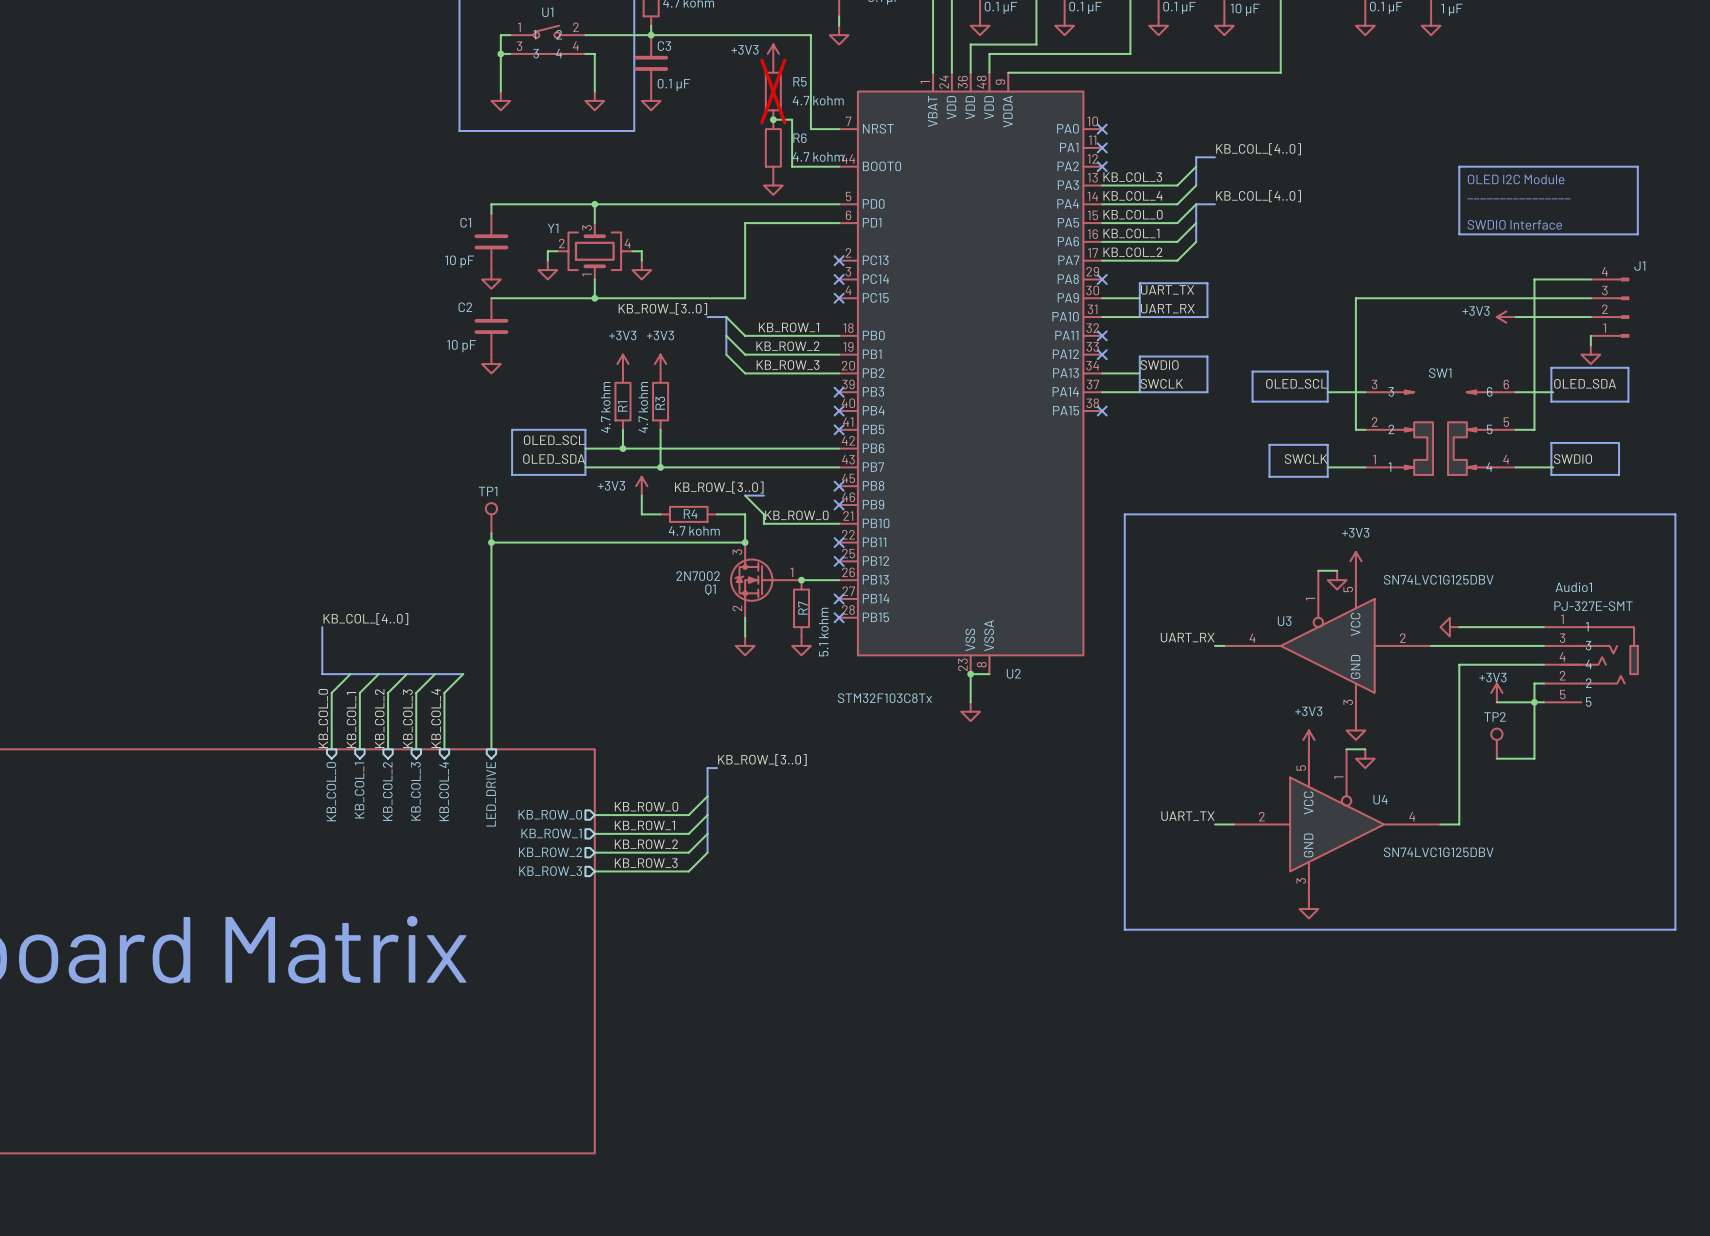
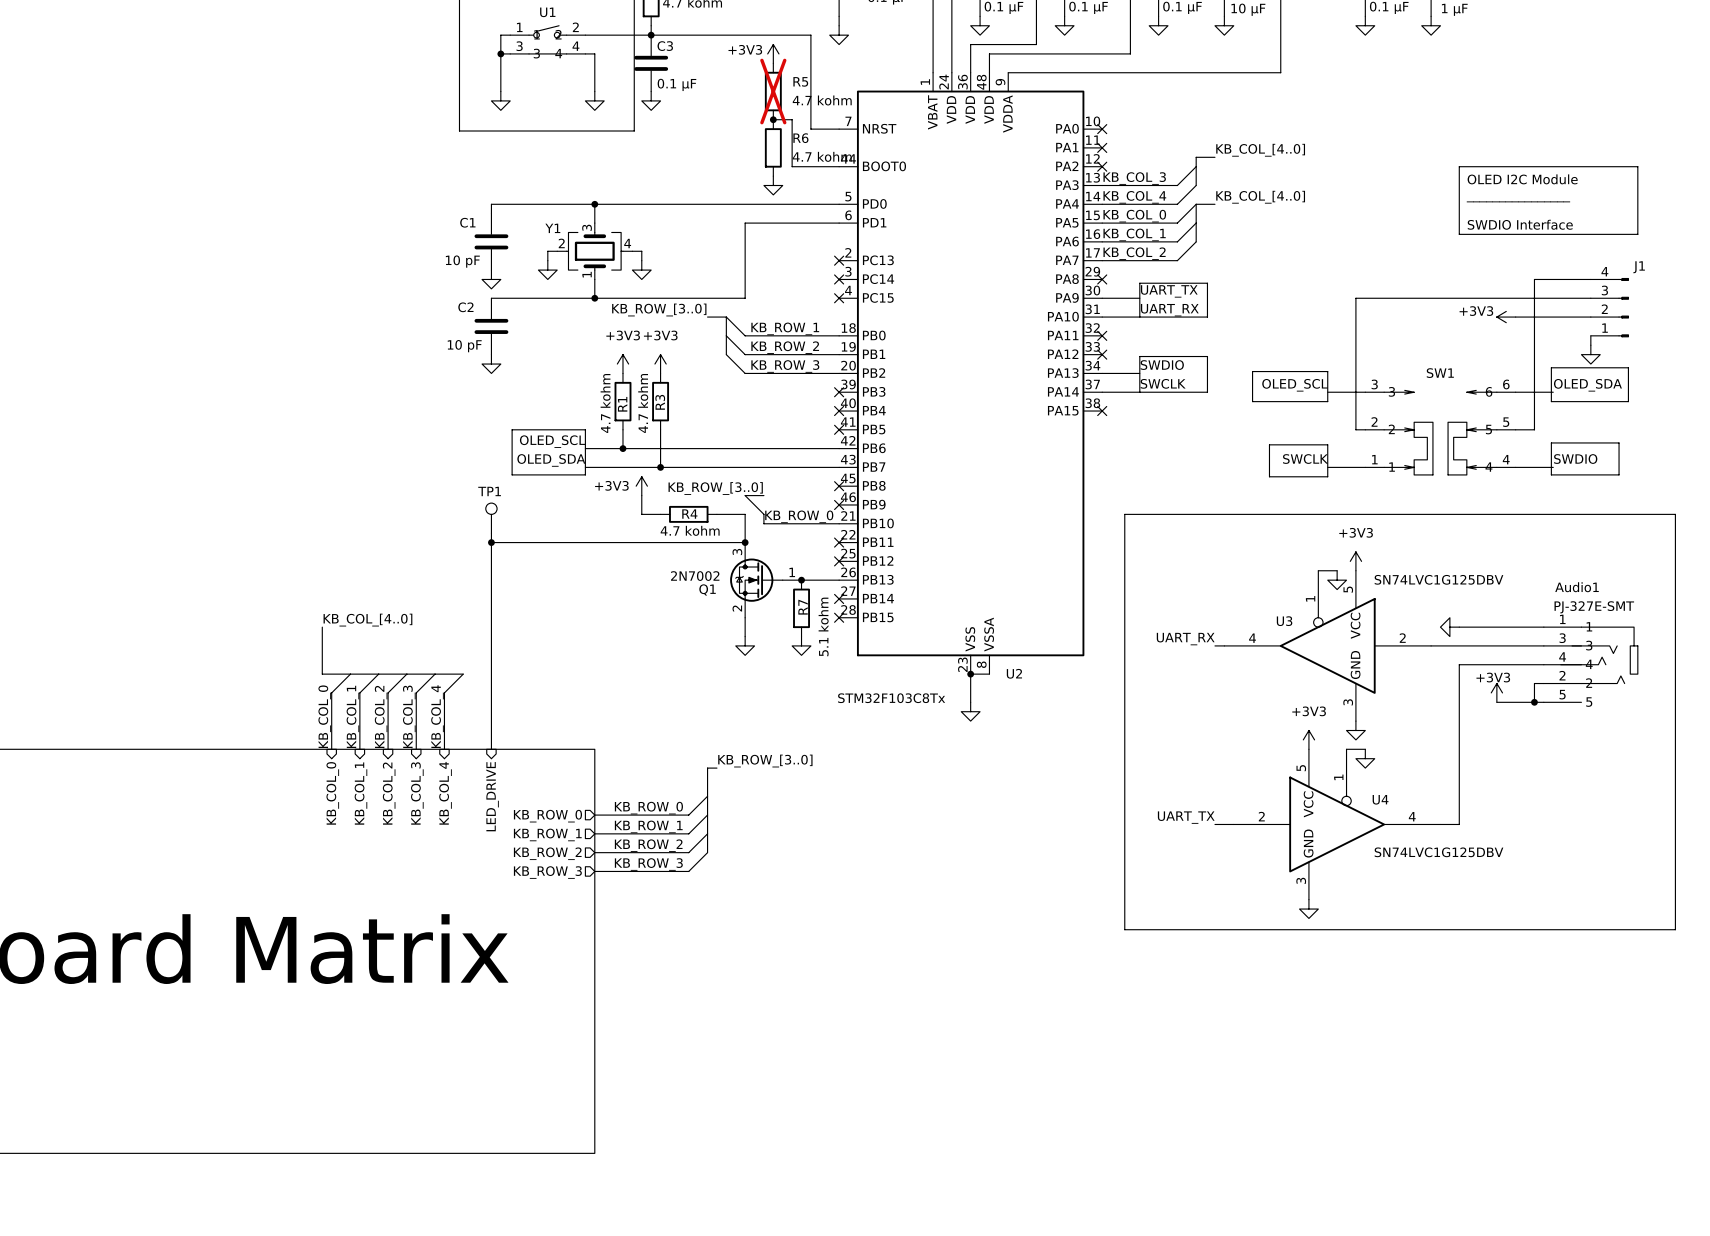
wire: (1534, 702) (1534, 758) (1496, 758) -> none
TP2: (1496, 743) -> none

